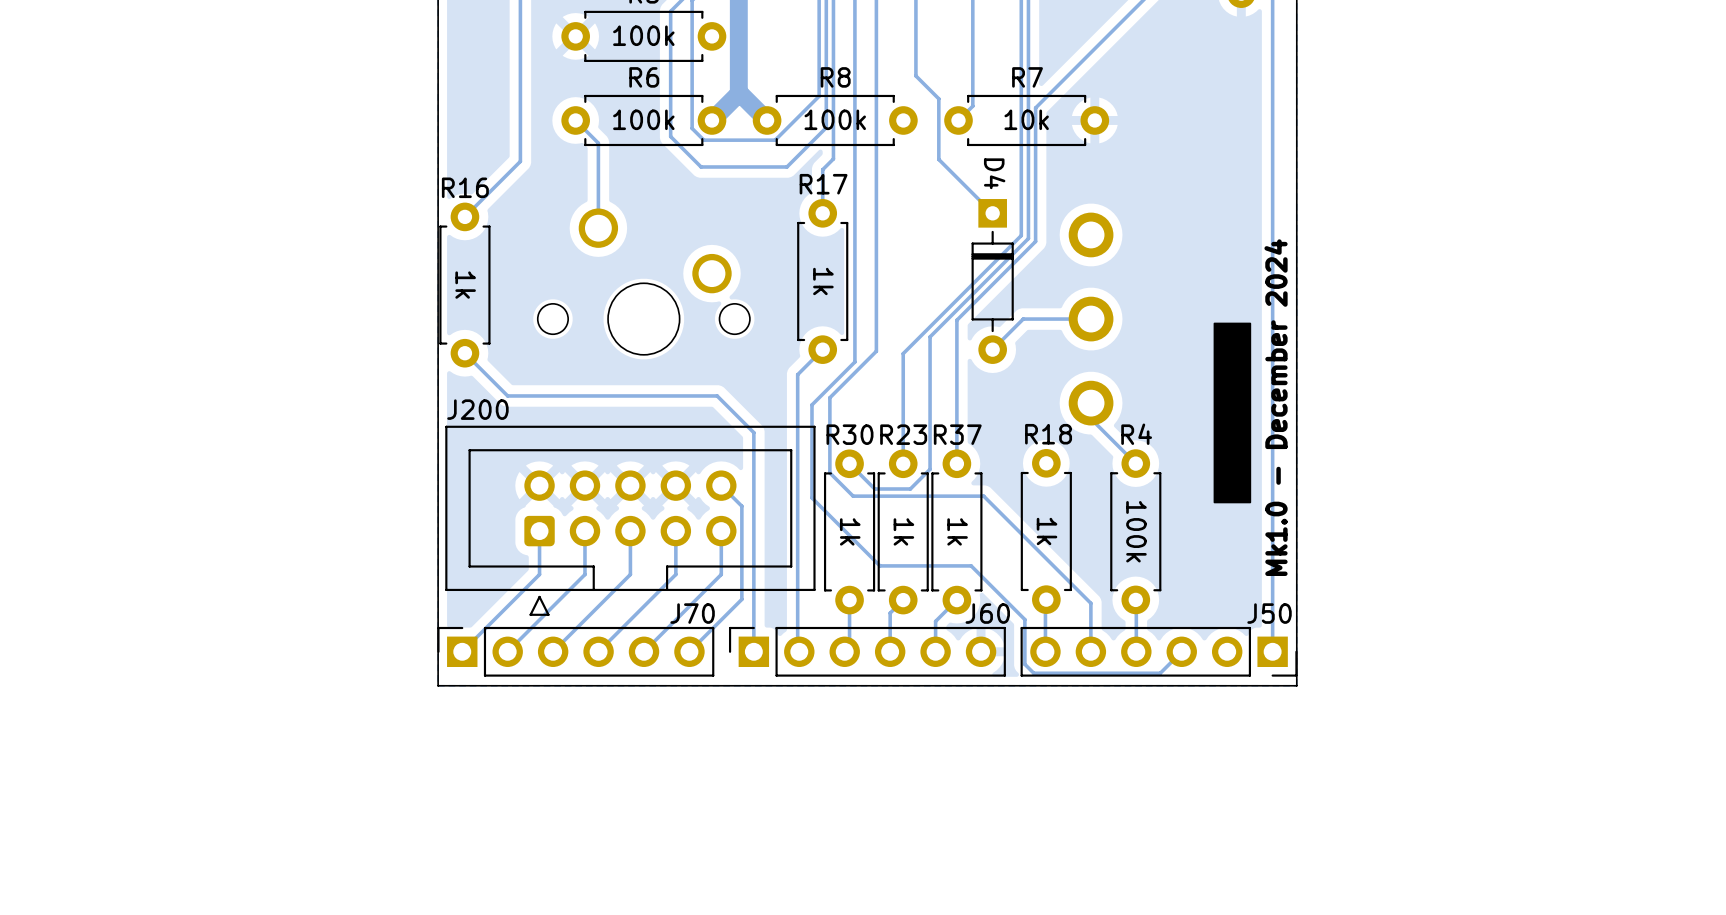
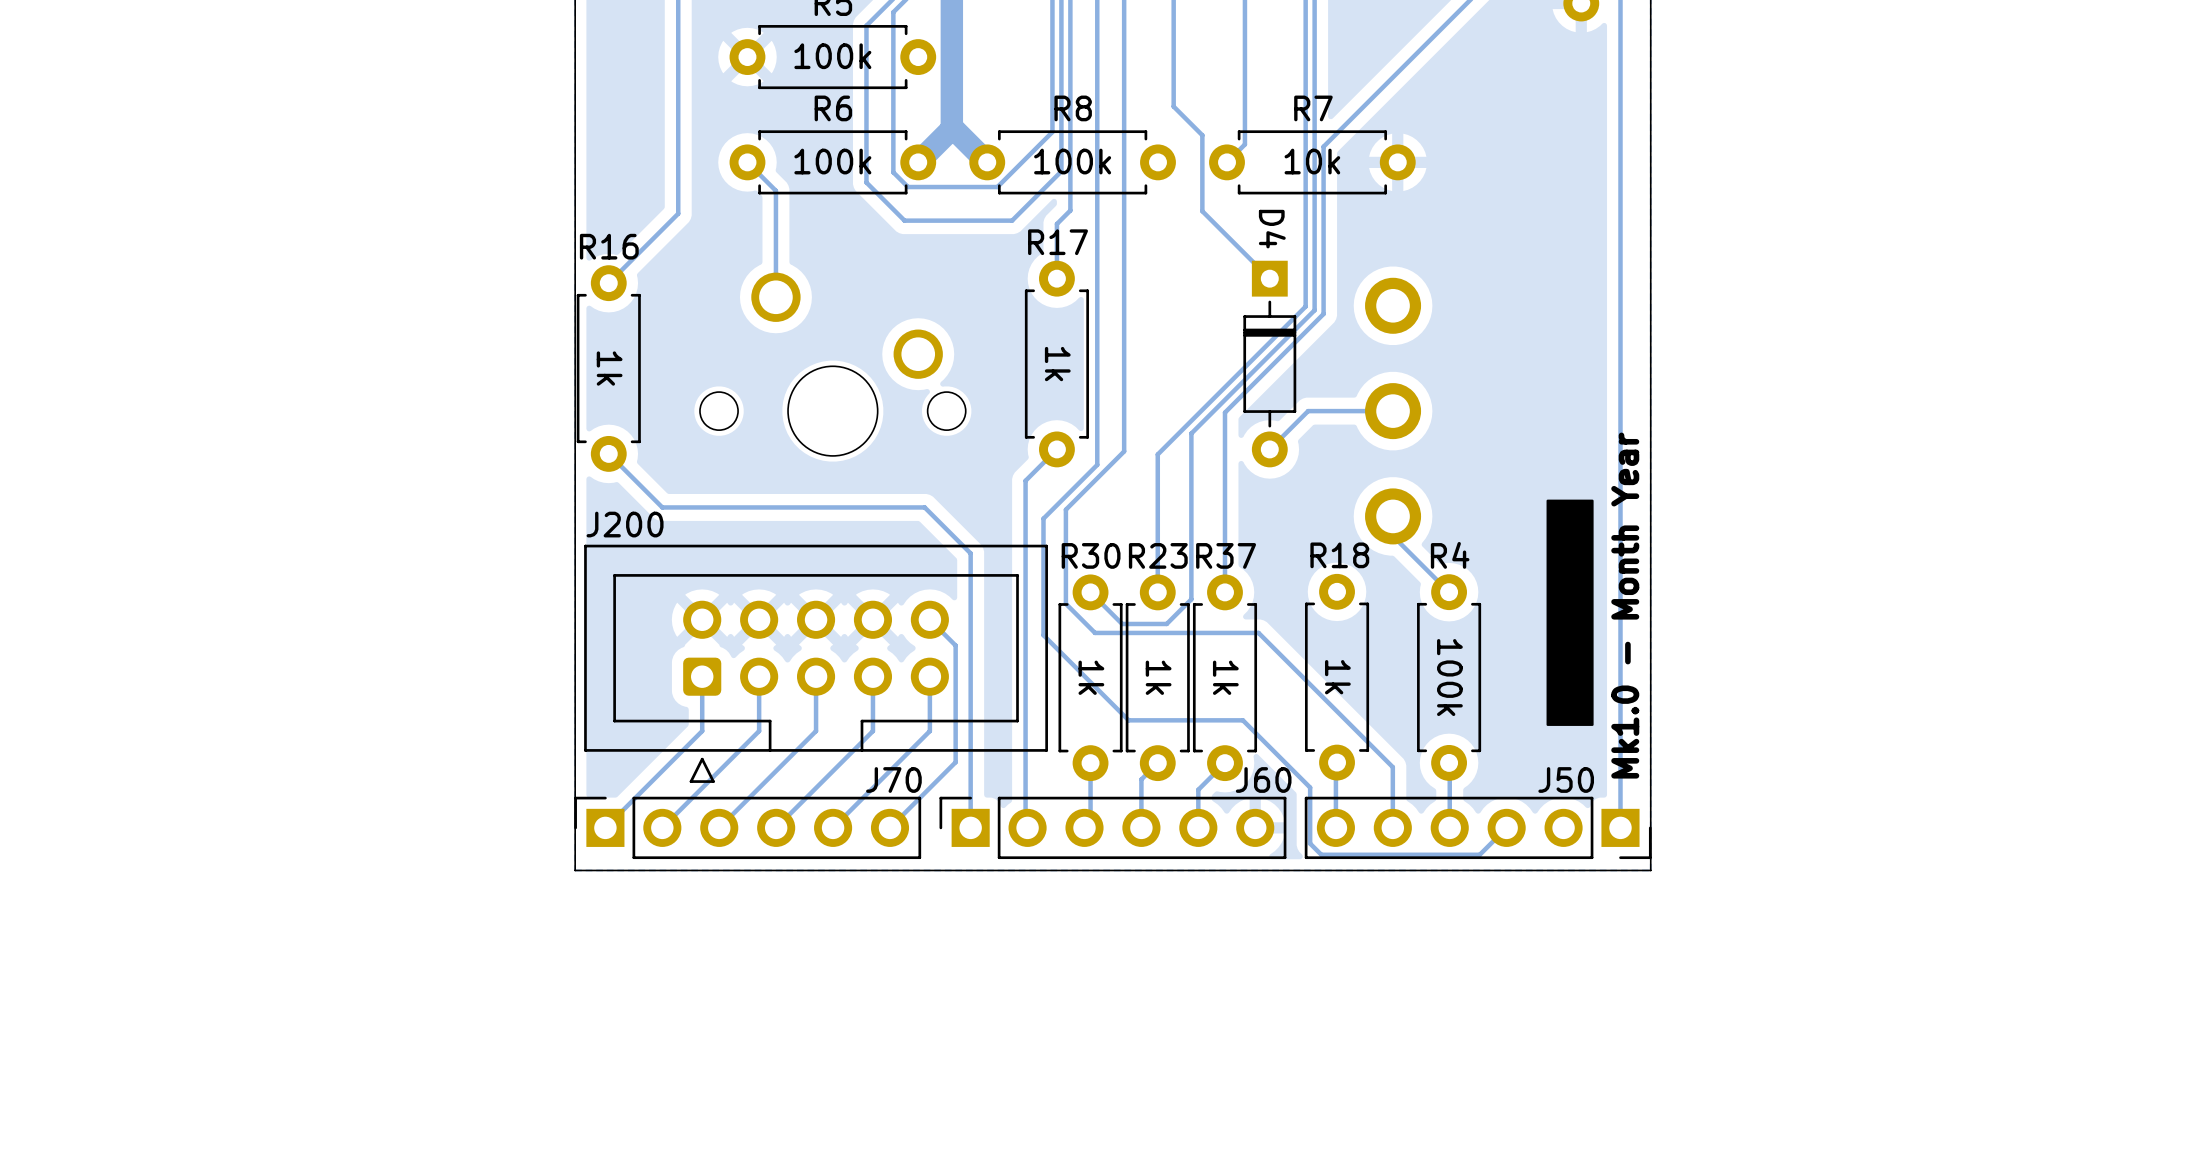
text: Mk1.0 - December 2024 (1276, 407) -> none
drawing position: (1232, 412) -> (1570, 612)
text: none -> Mk1.0 - Month Year (1625, 605)
J50 name position: J50 (1269, 613) -> J50 (1566, 780)

